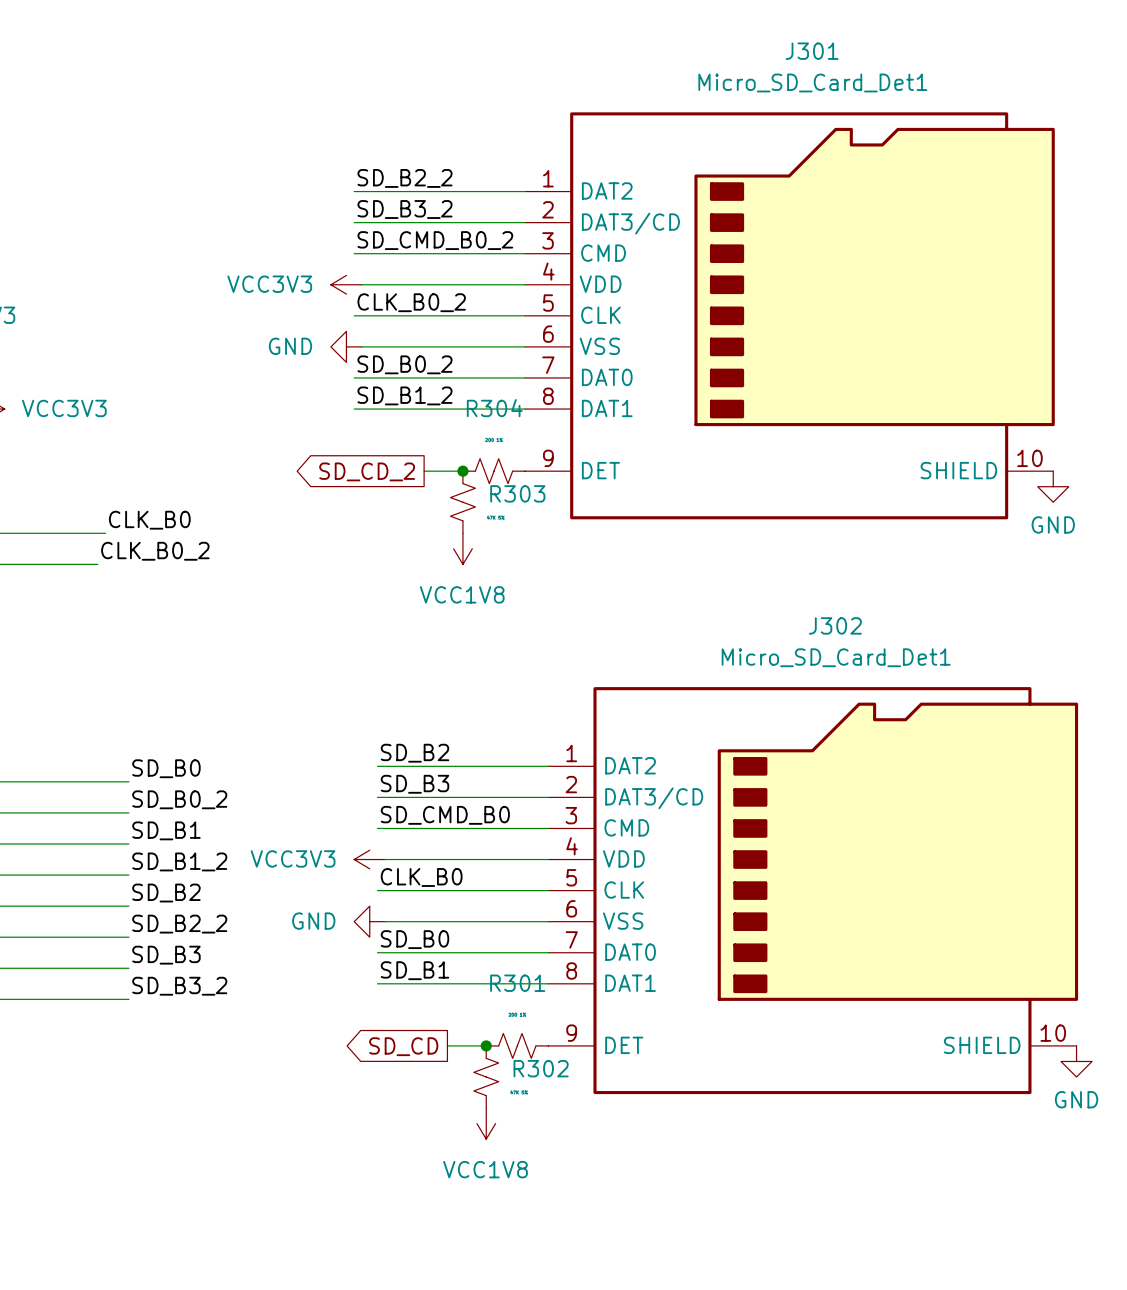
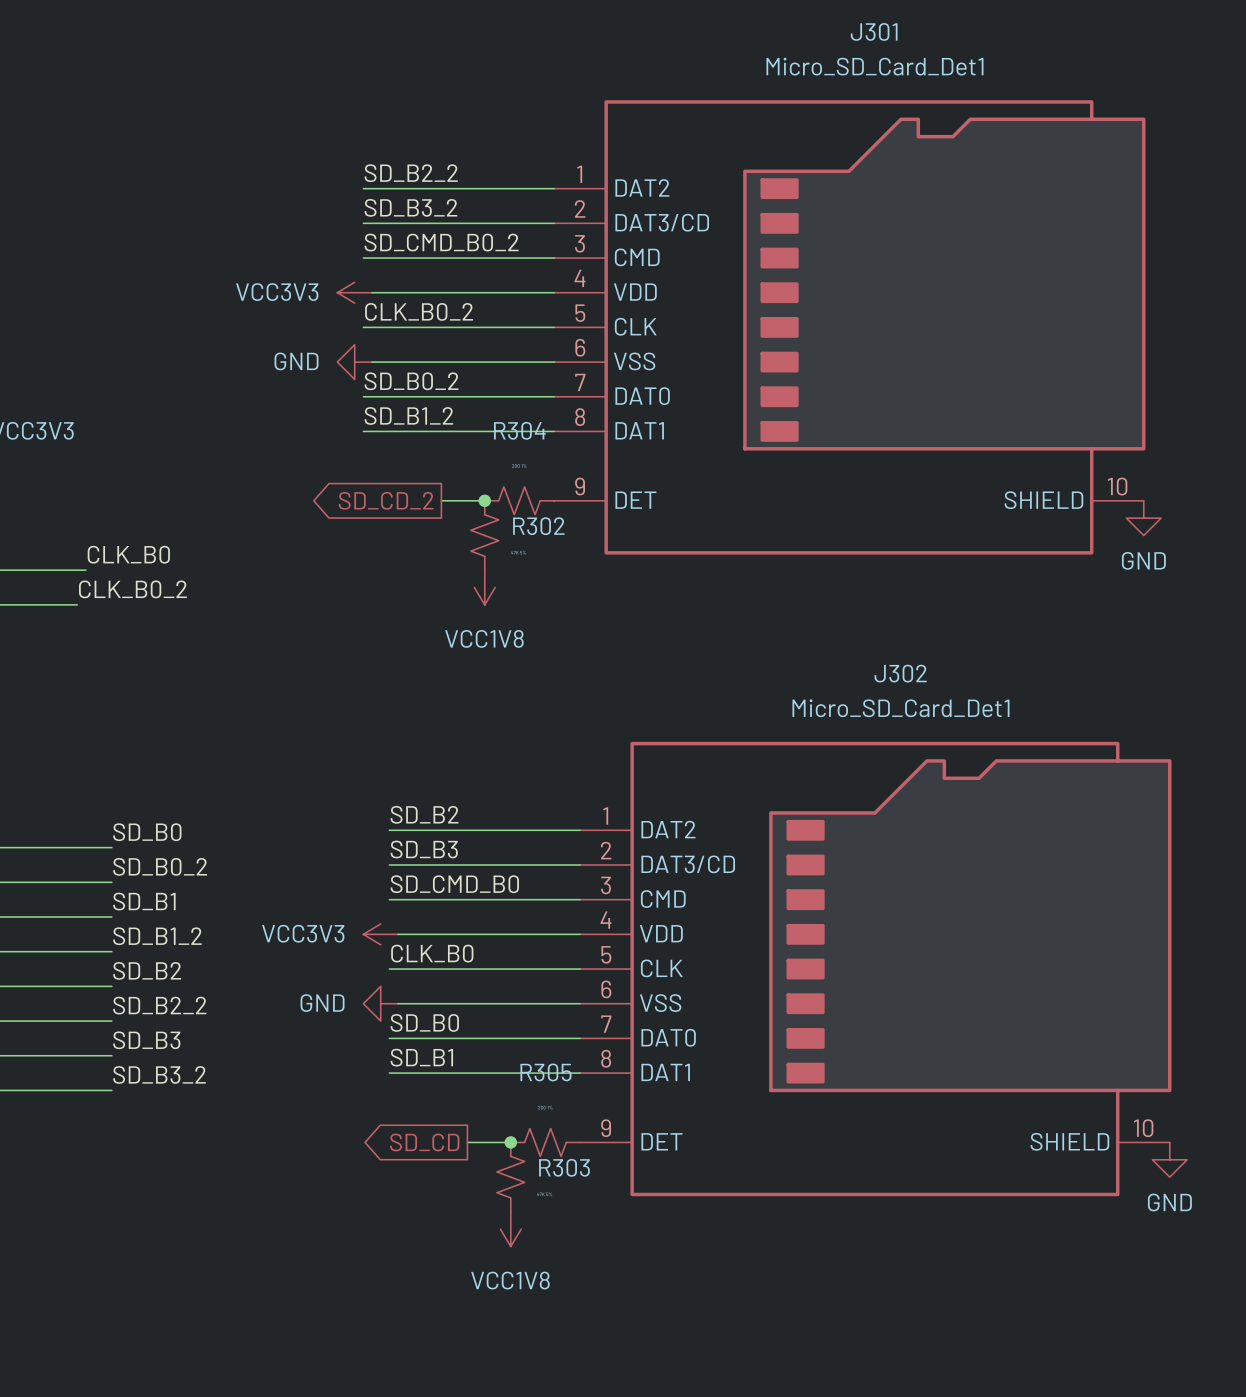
R303 name: R303 (517, 493) -> R302 (538, 526)
R301 name: R301 (517, 983) -> R305 (546, 1072)
R302 name: R302 (541, 1068) -> R303 (564, 1167)

